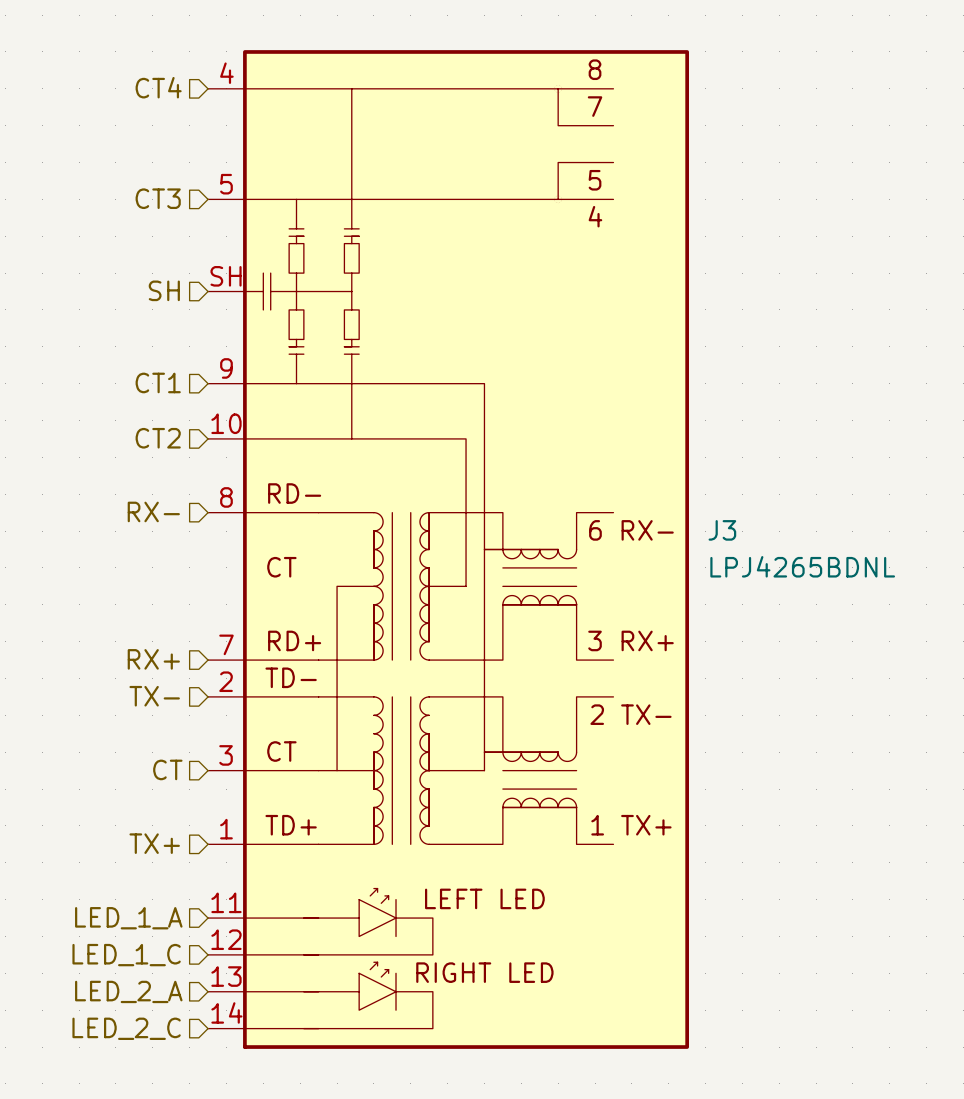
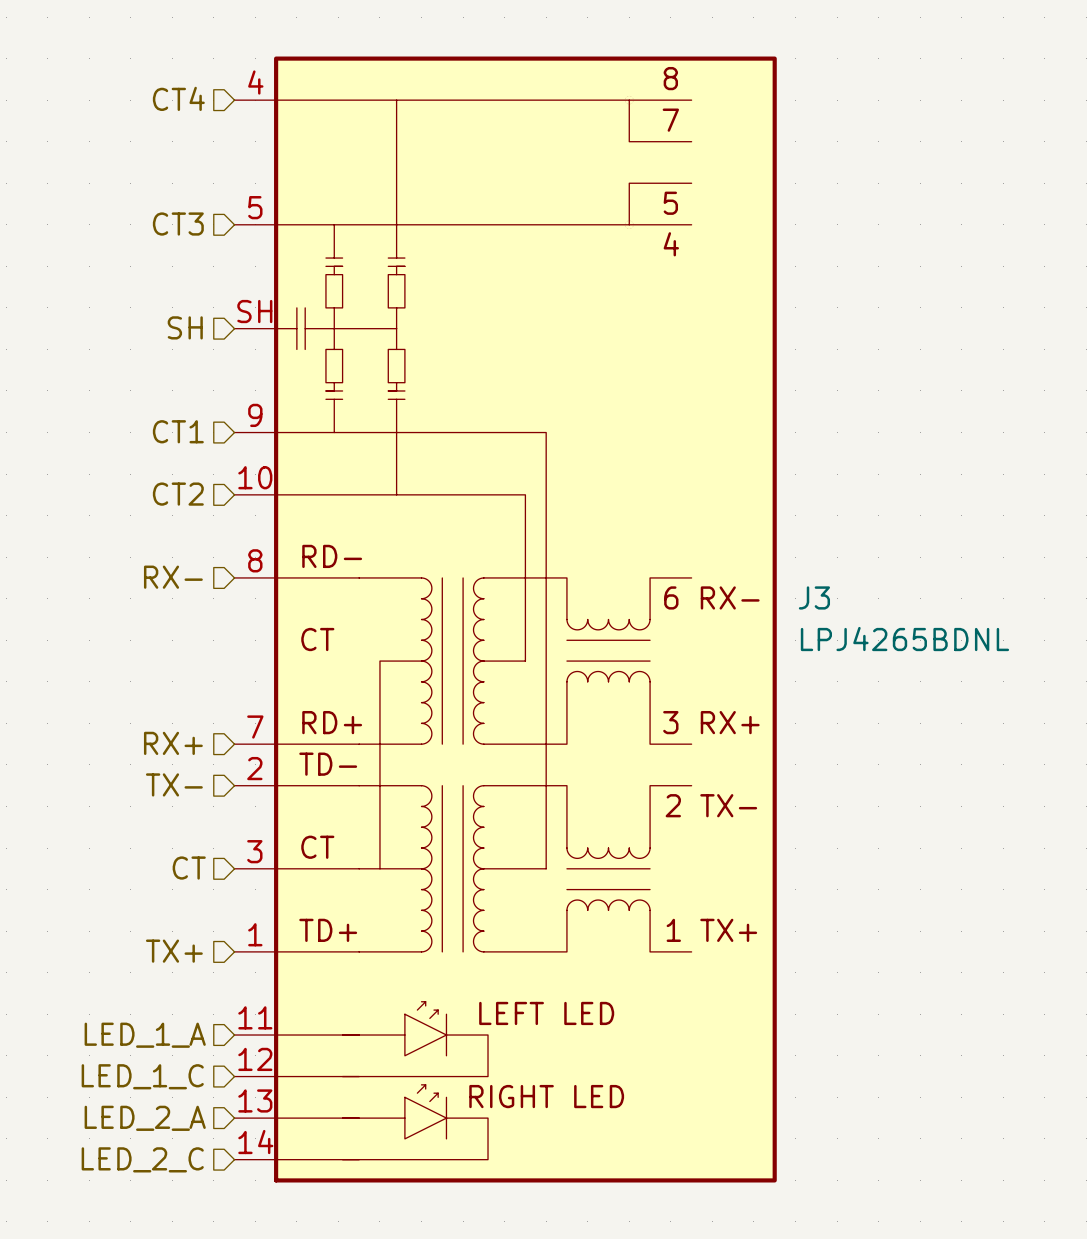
J3 symbol: [208, 50, 689, 1049] -> [234, 56, 777, 1183]

